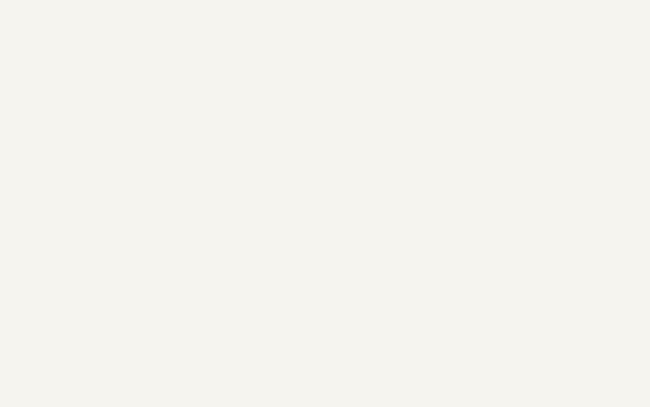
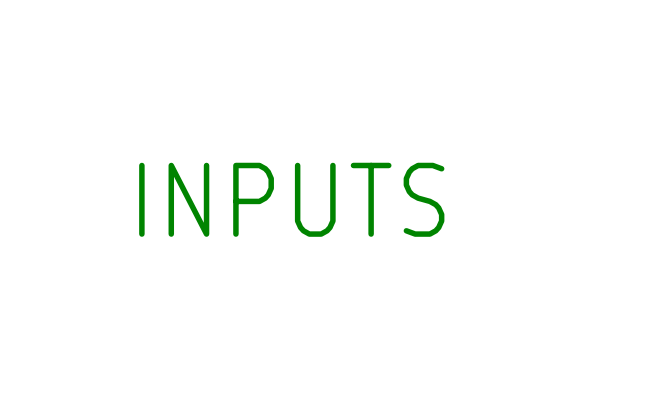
text: none -> INPUTS (291, 199)

